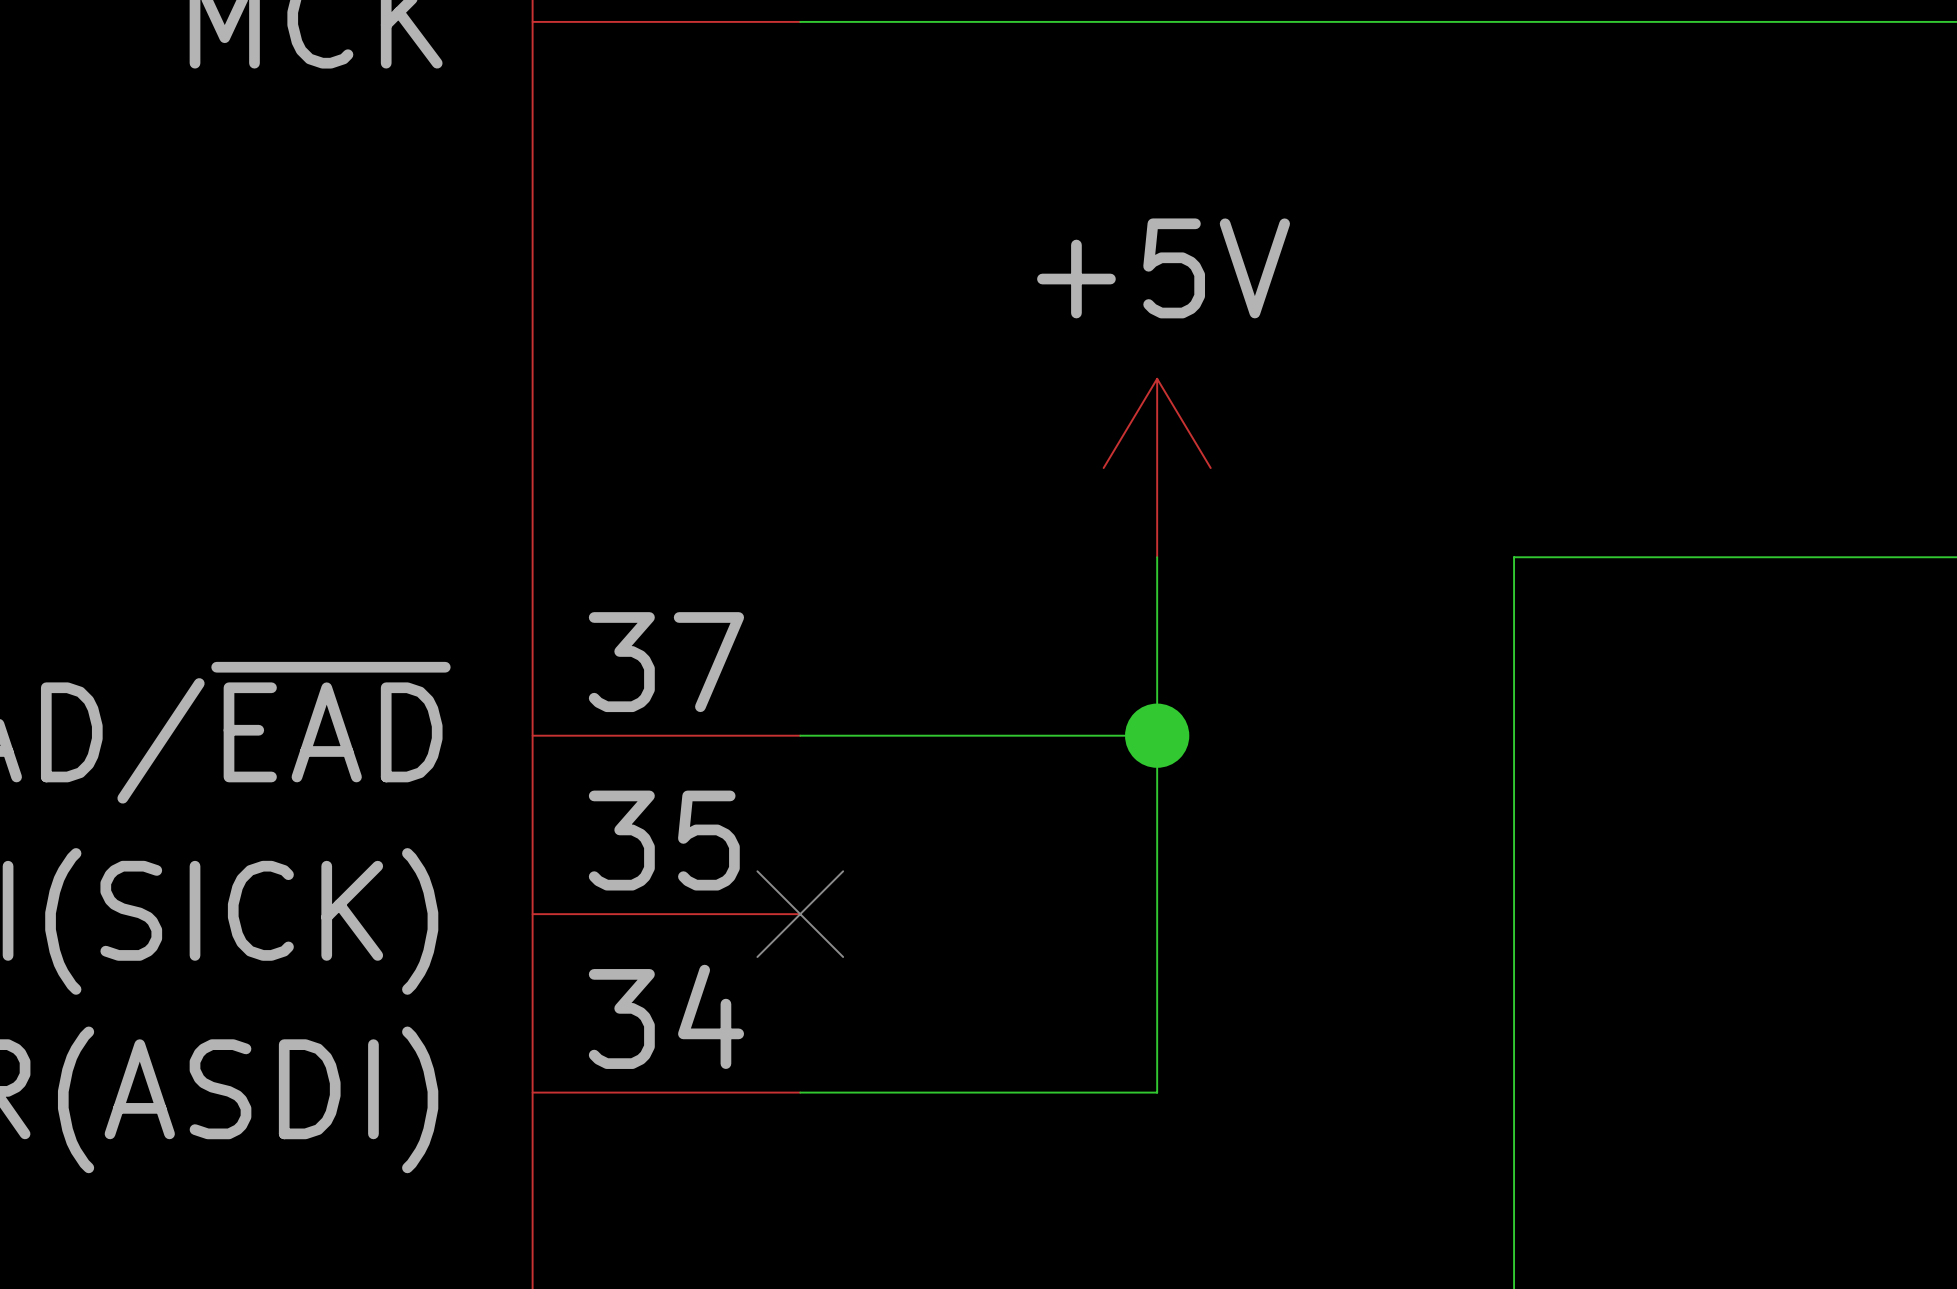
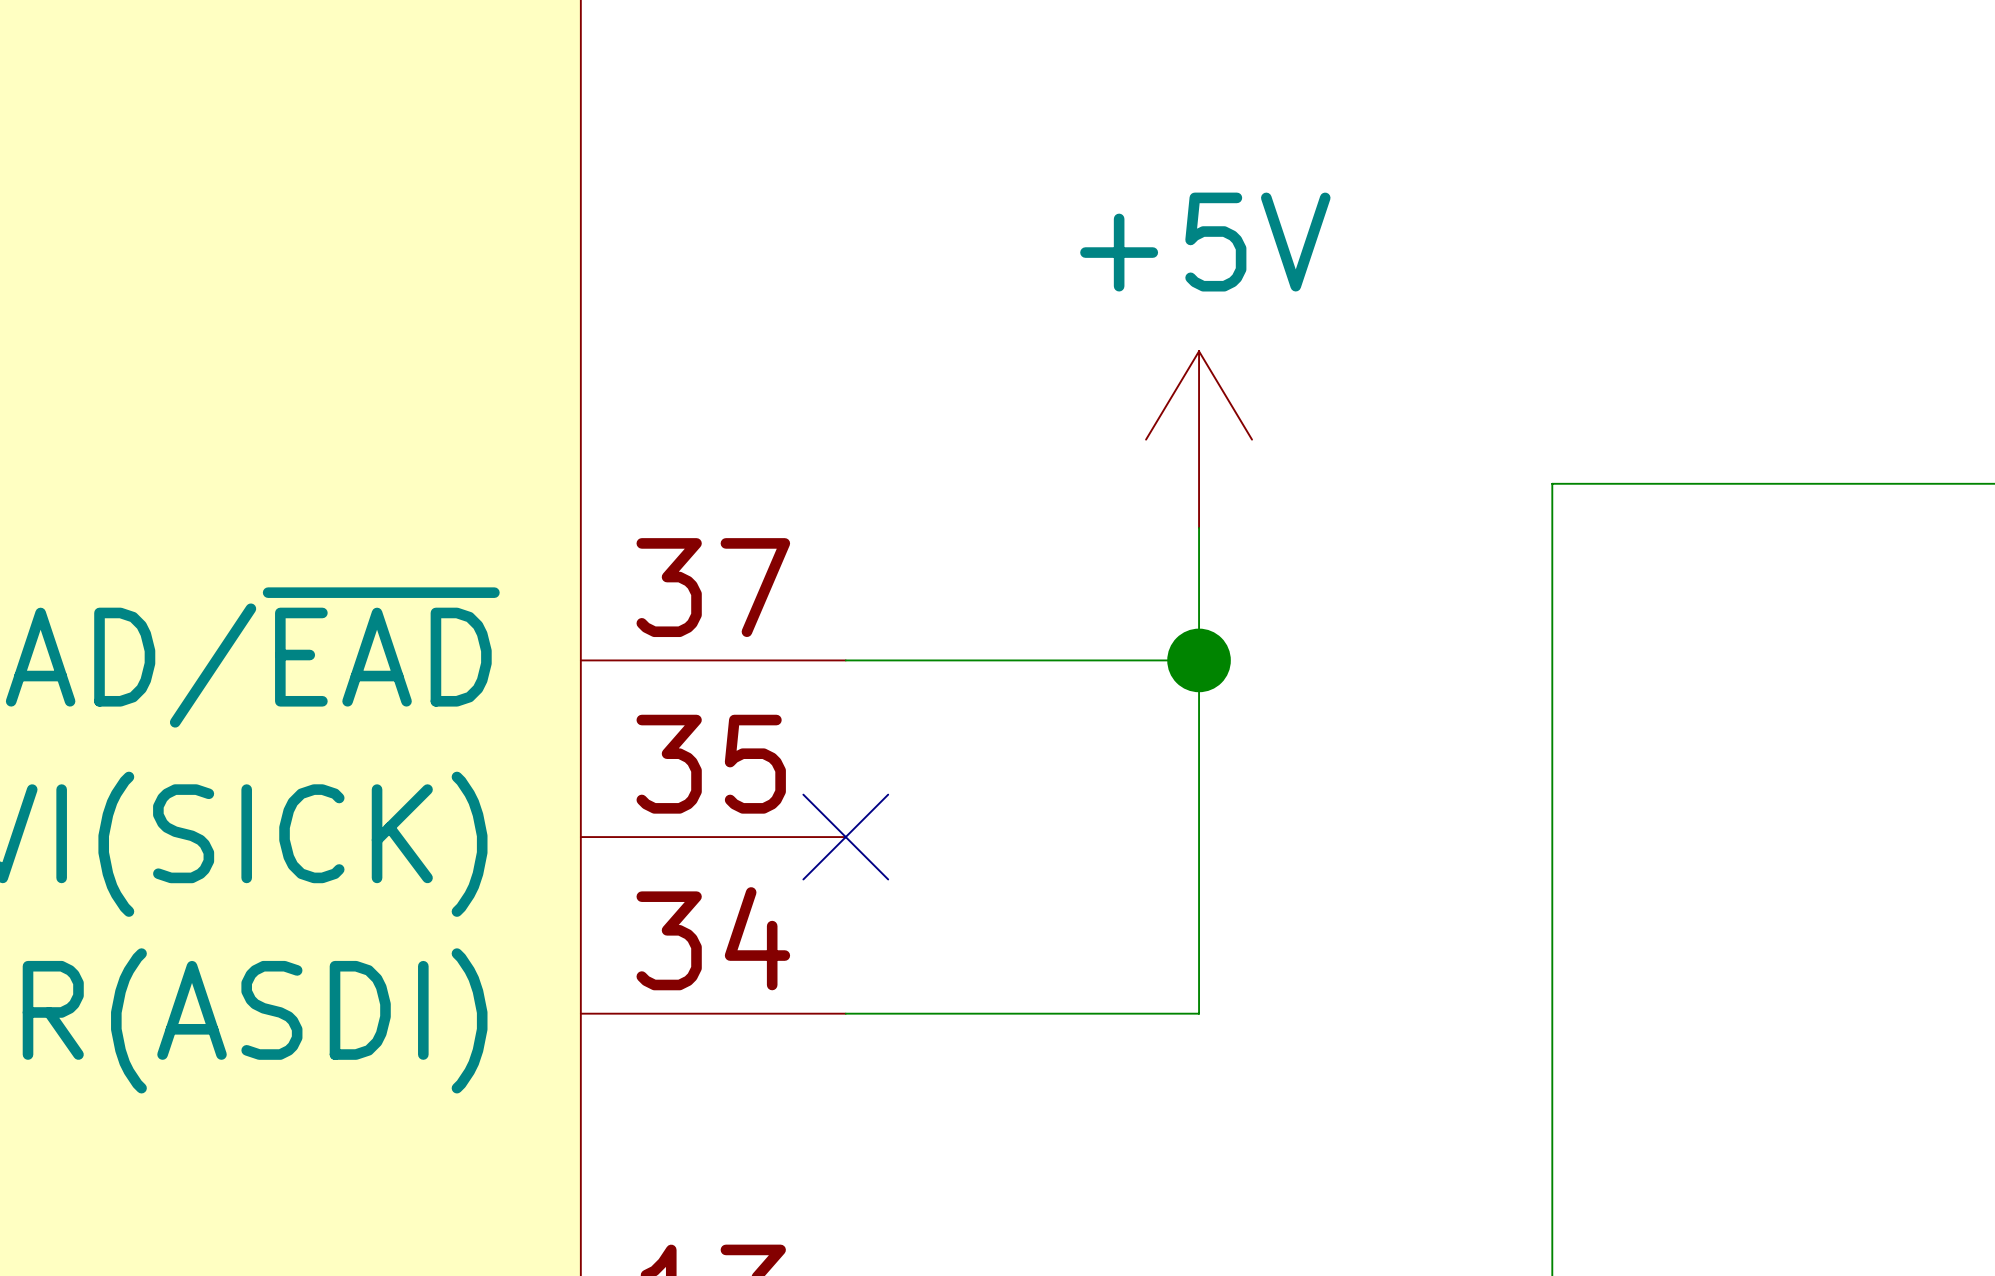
power symbol position: +5V (1157, 468) -> +5V (1199, 439)

